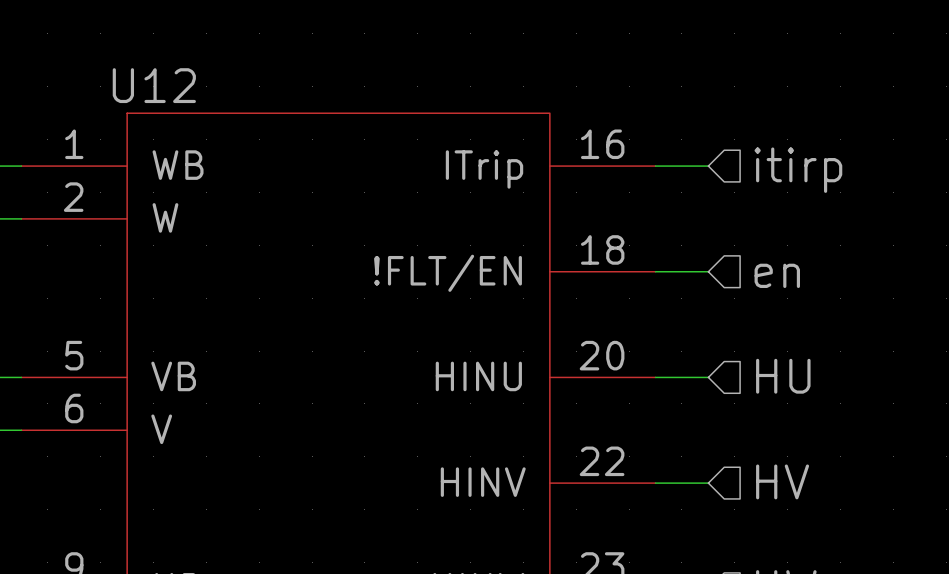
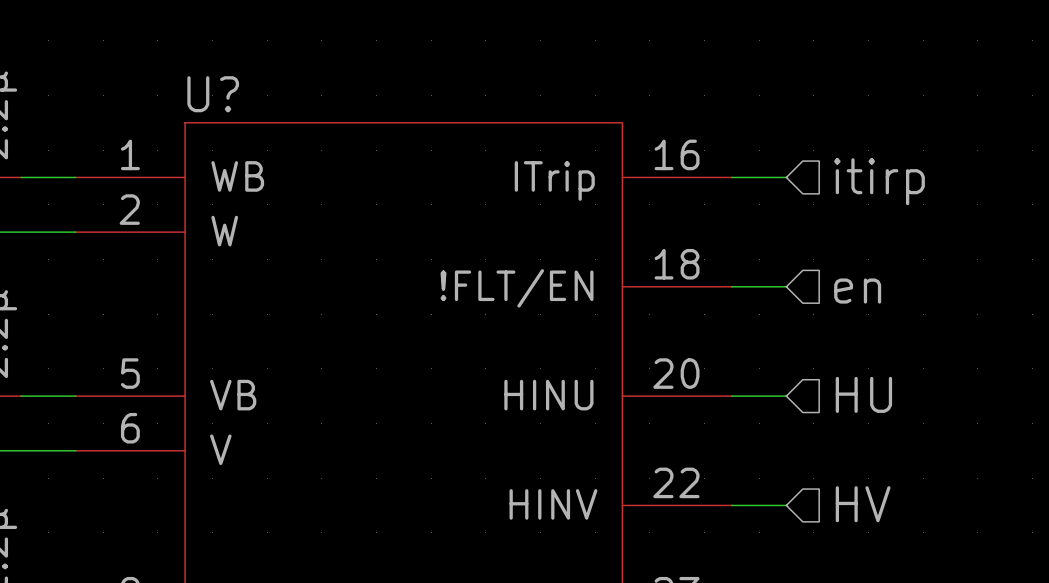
U12 name: U12 (154, 85) -> U? (213, 94)

